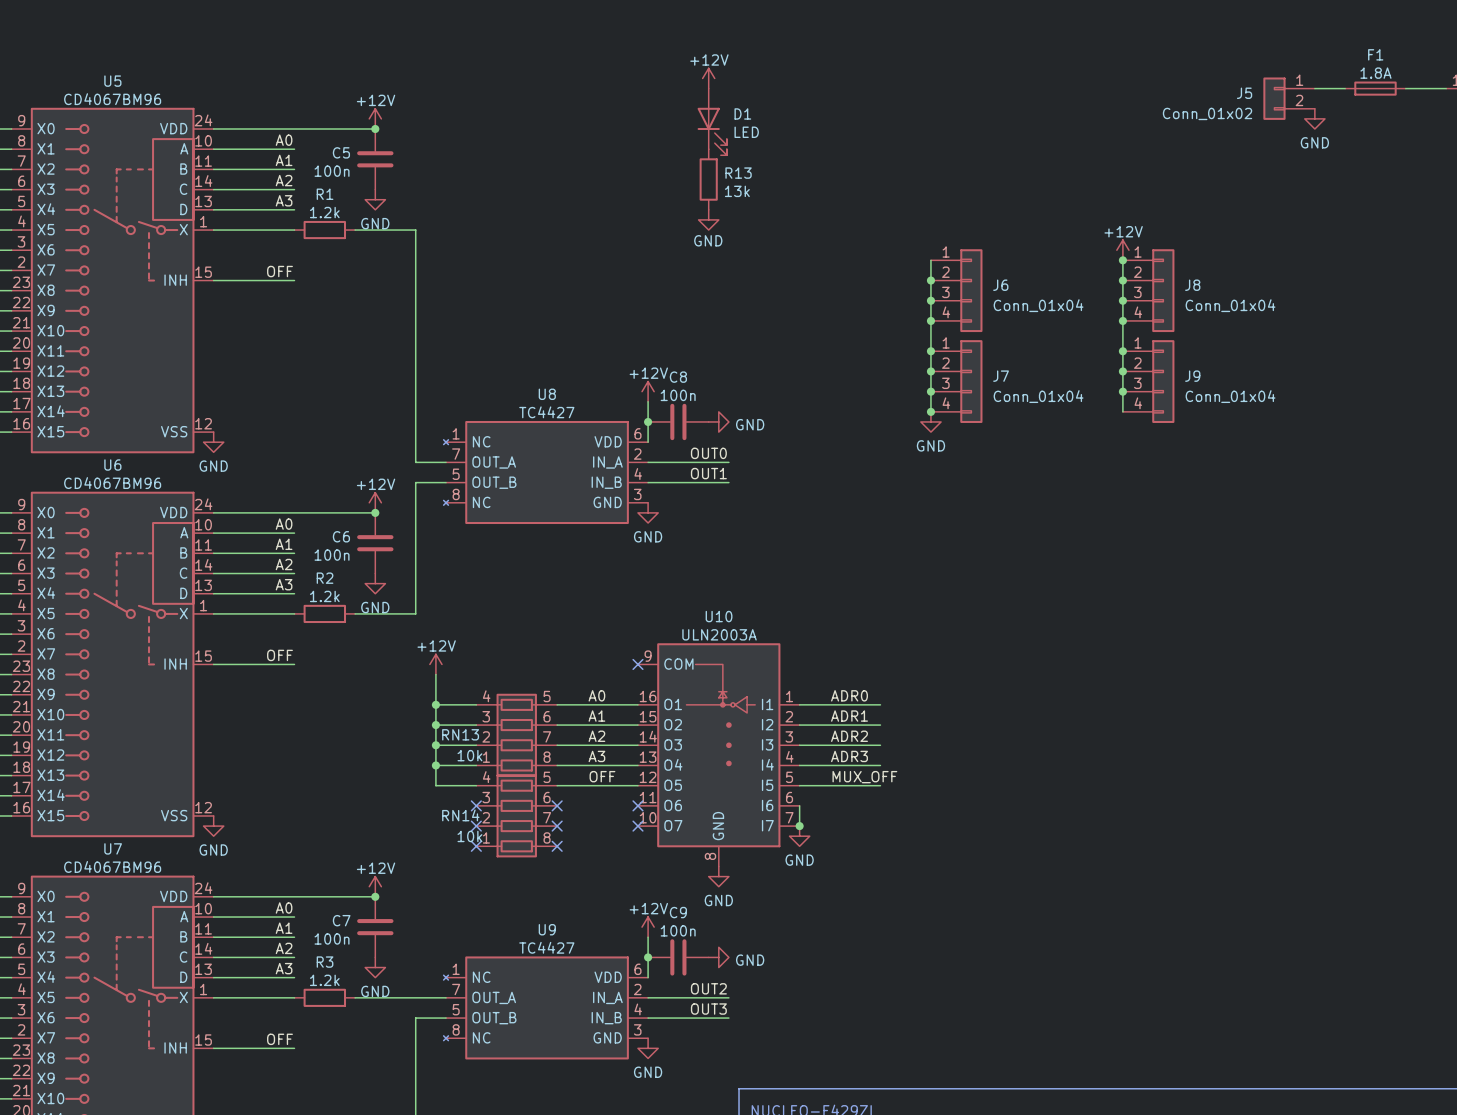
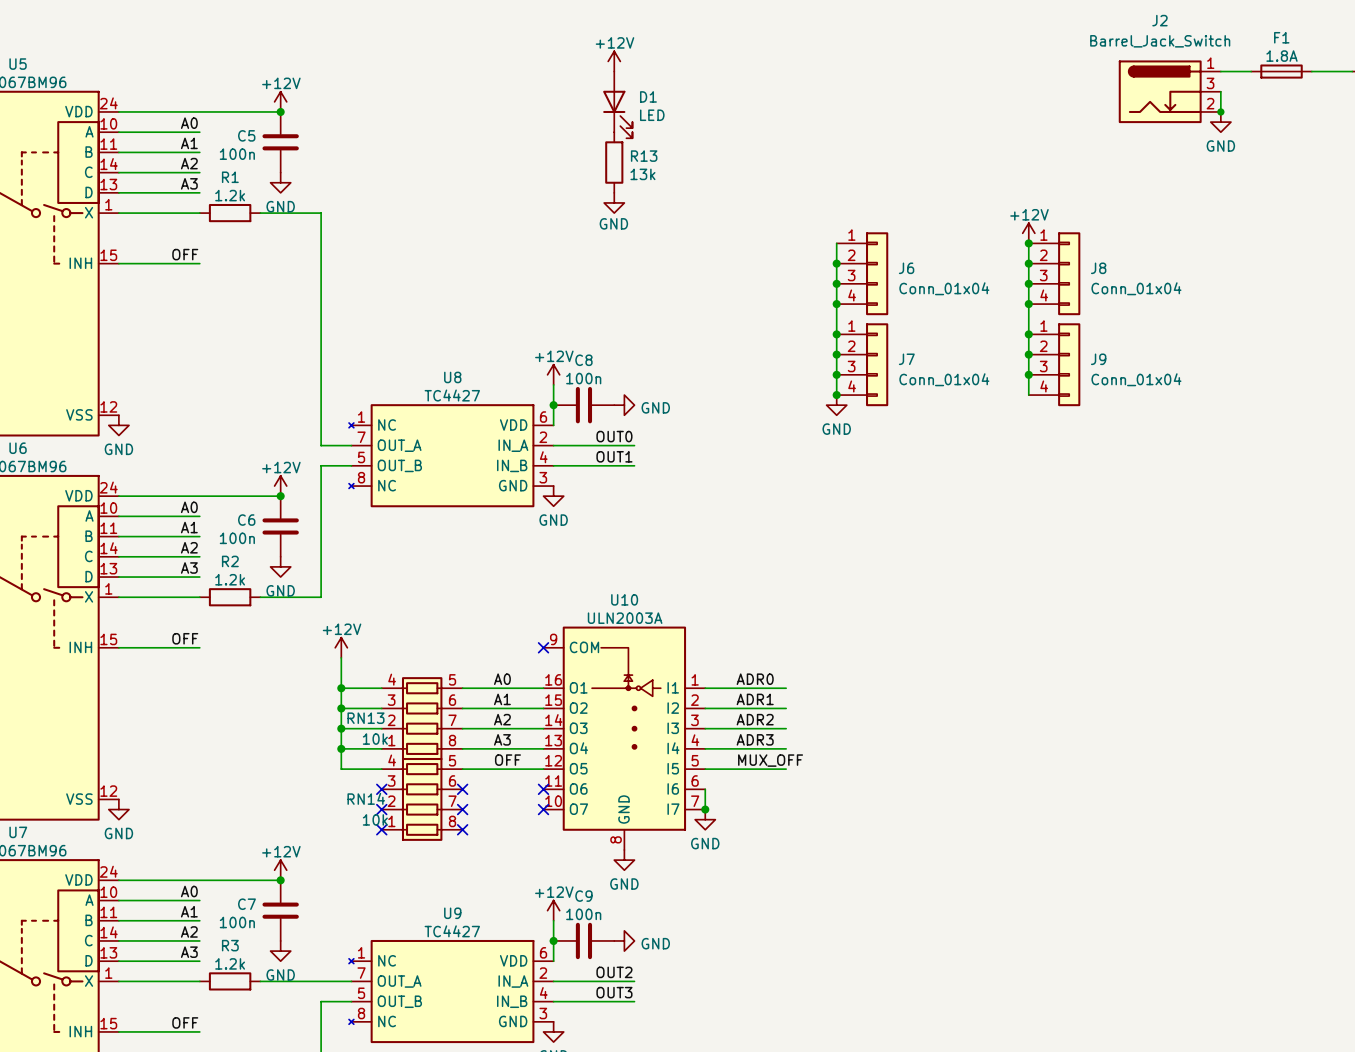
J5: Conn_01x02 (1289, 98) -> none
J2: none -> Barrel_Jack_Switch (1169, 91)
power symbol position: GND (1314, 118) -> GND (1220, 122)
junction: none -> (1220, 111)

